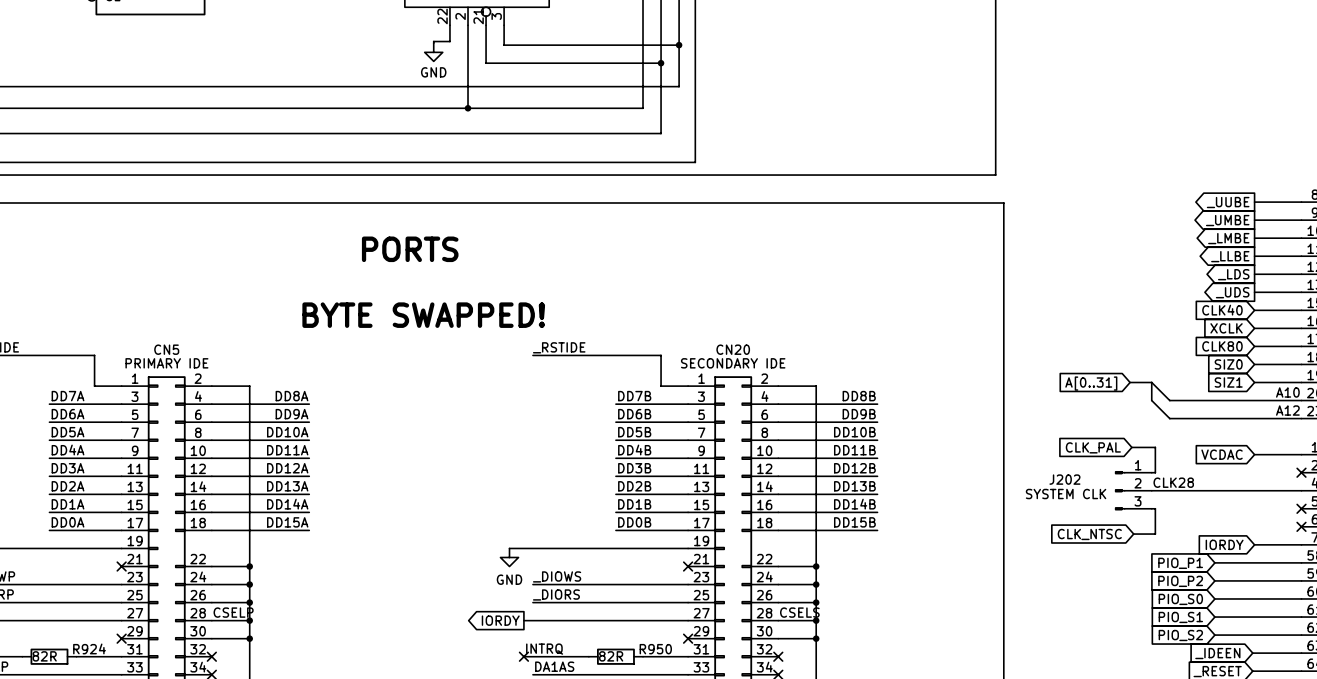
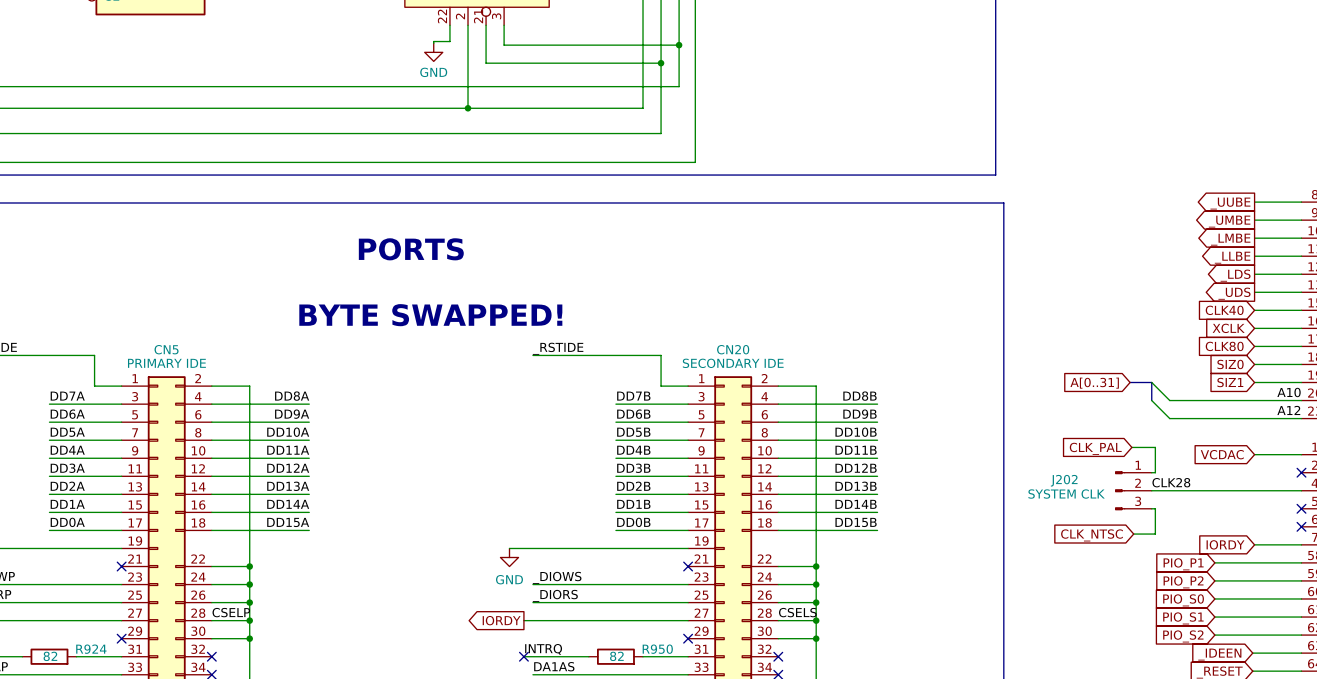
R924 value: 82R (44, 656) -> 82 (50, 656)
R950 value: 82R (611, 656) -> 82 (616, 656)

